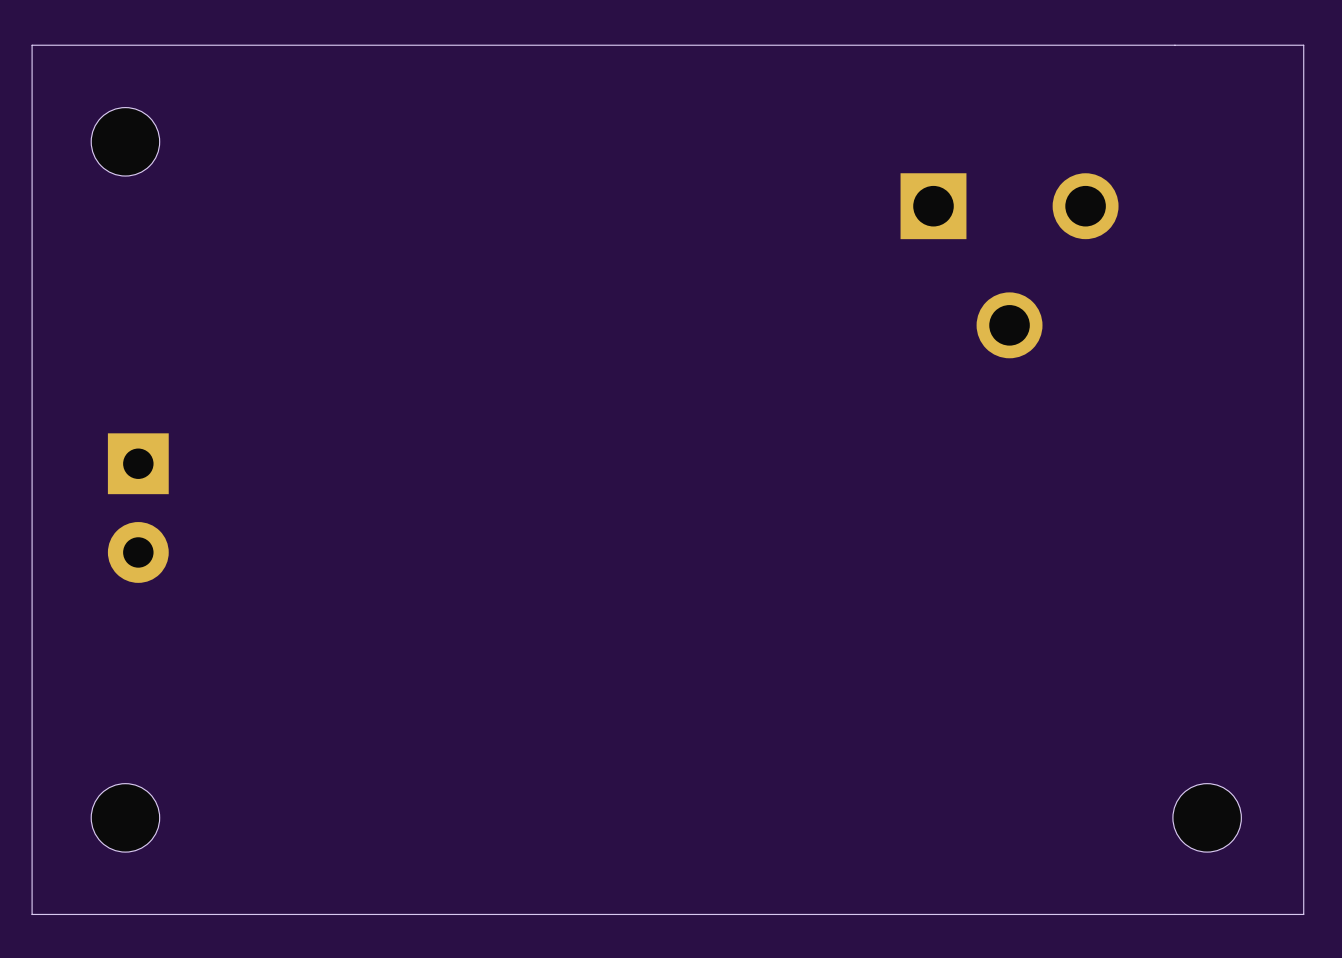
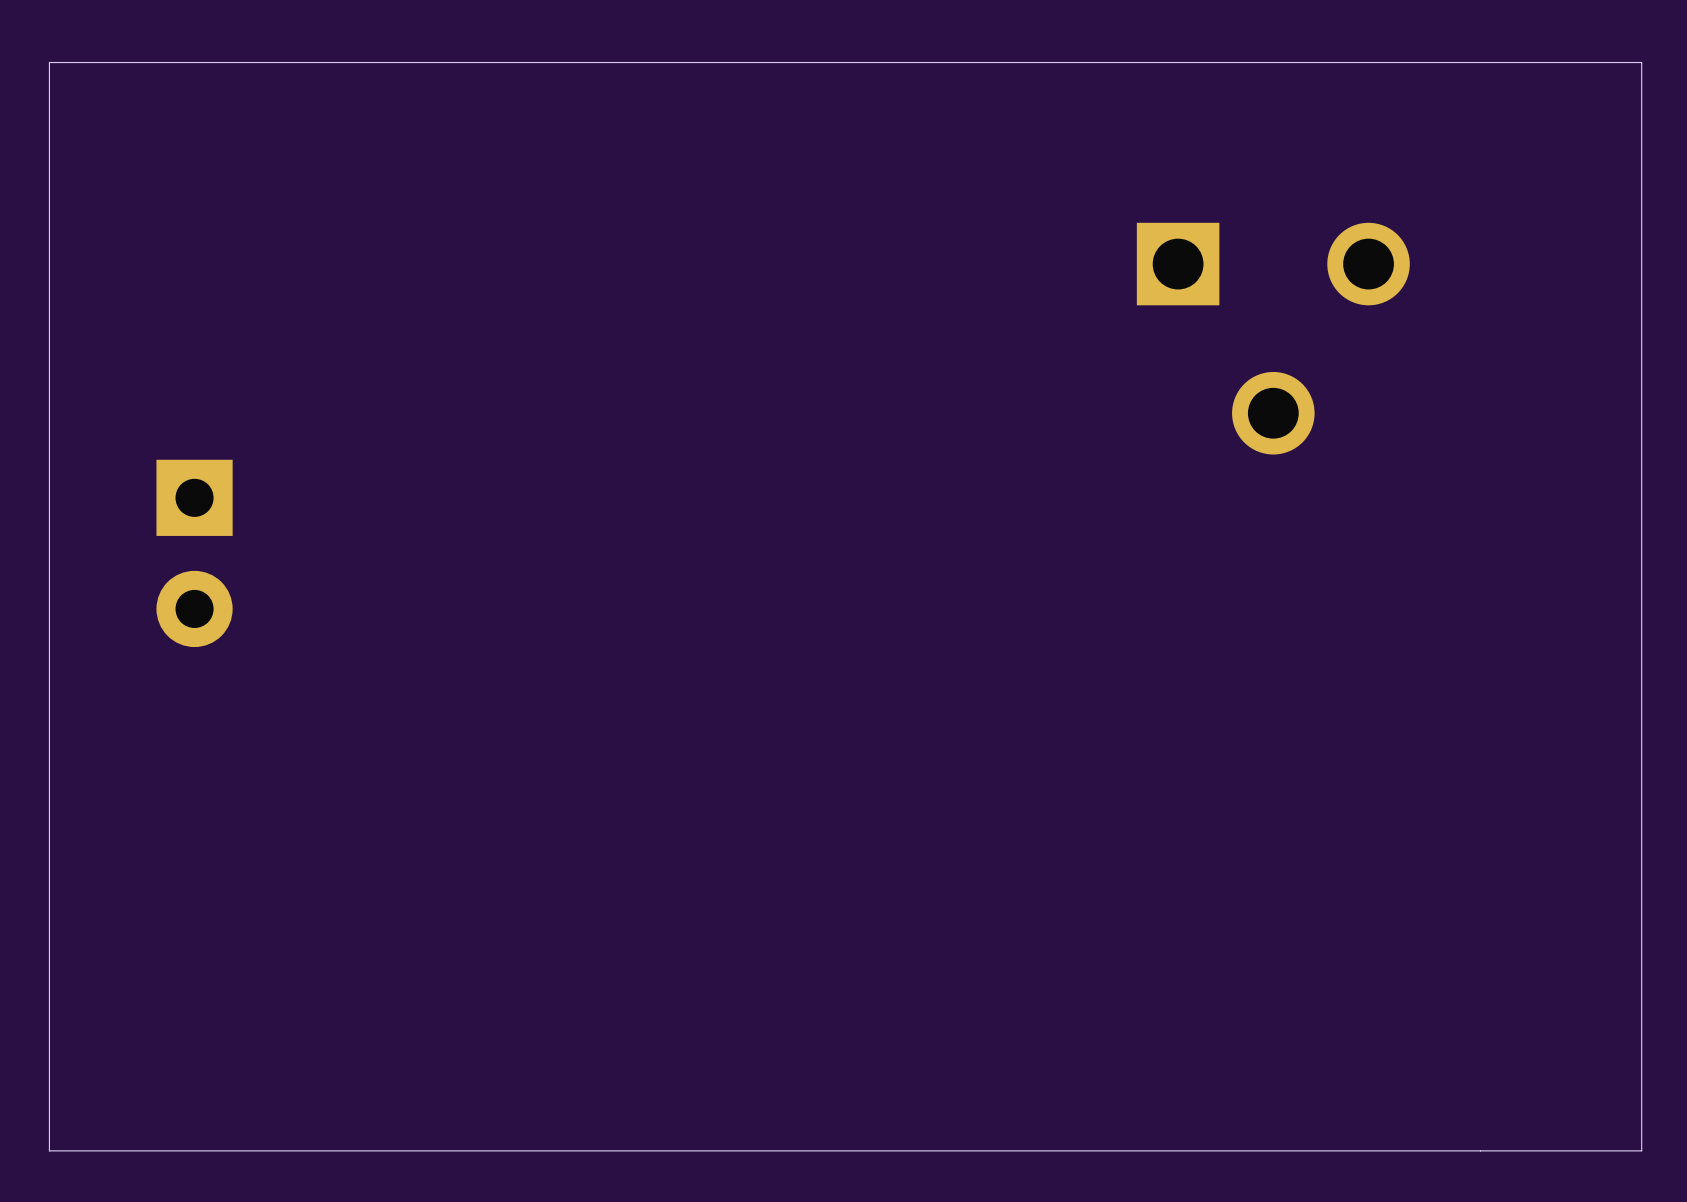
part: (125, 141) -> none
part position: (138, 508) -> (194, 553)
part: (125, 817) -> none
part: (1207, 817) -> none

